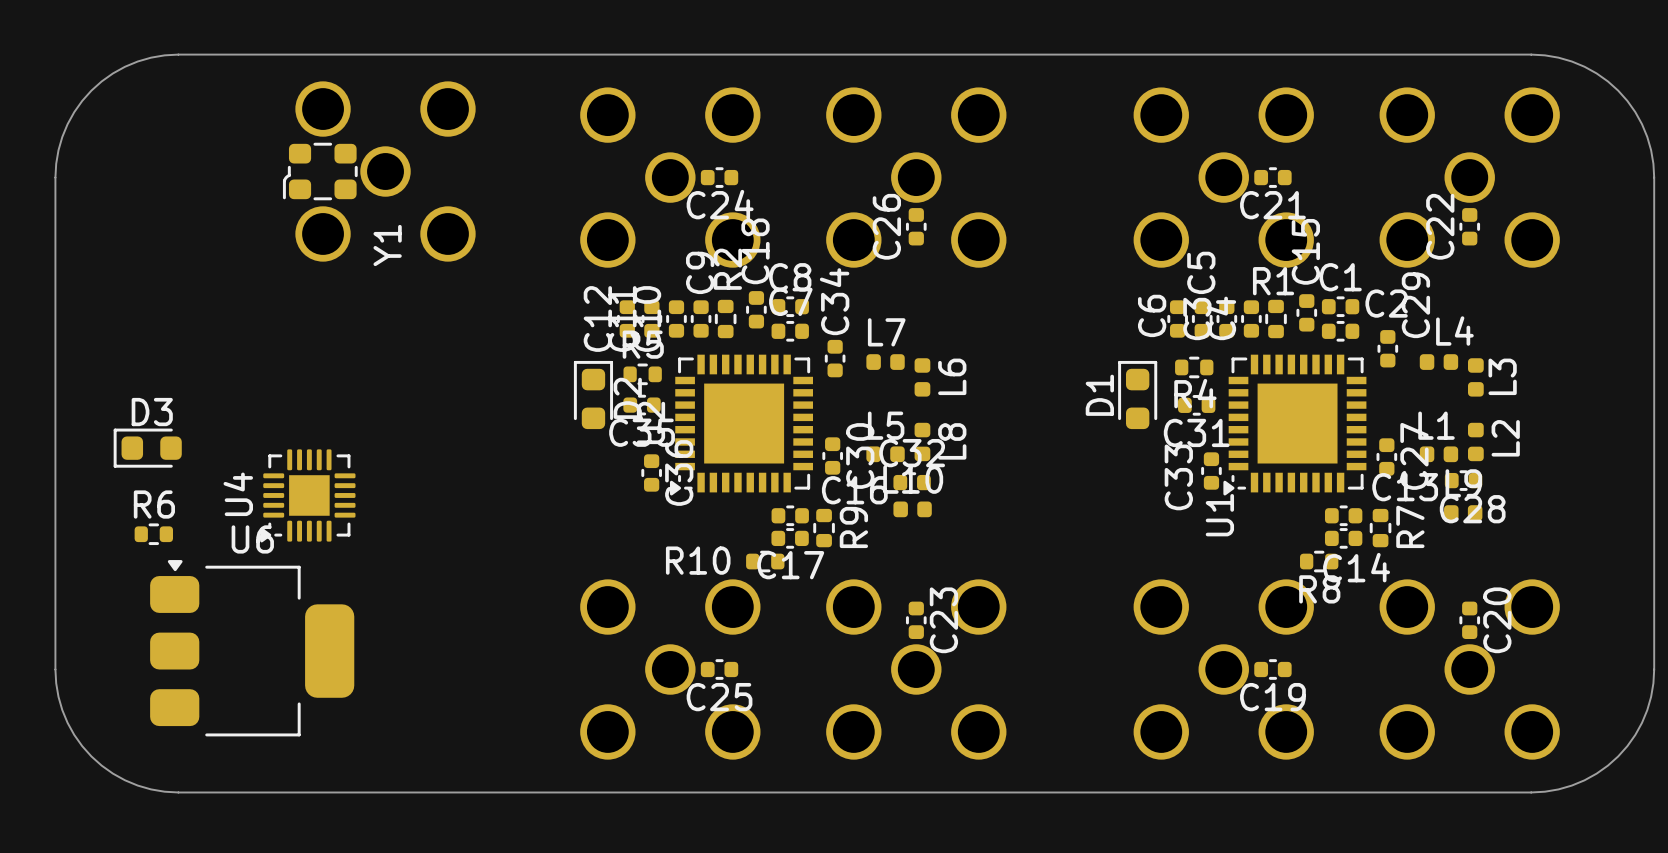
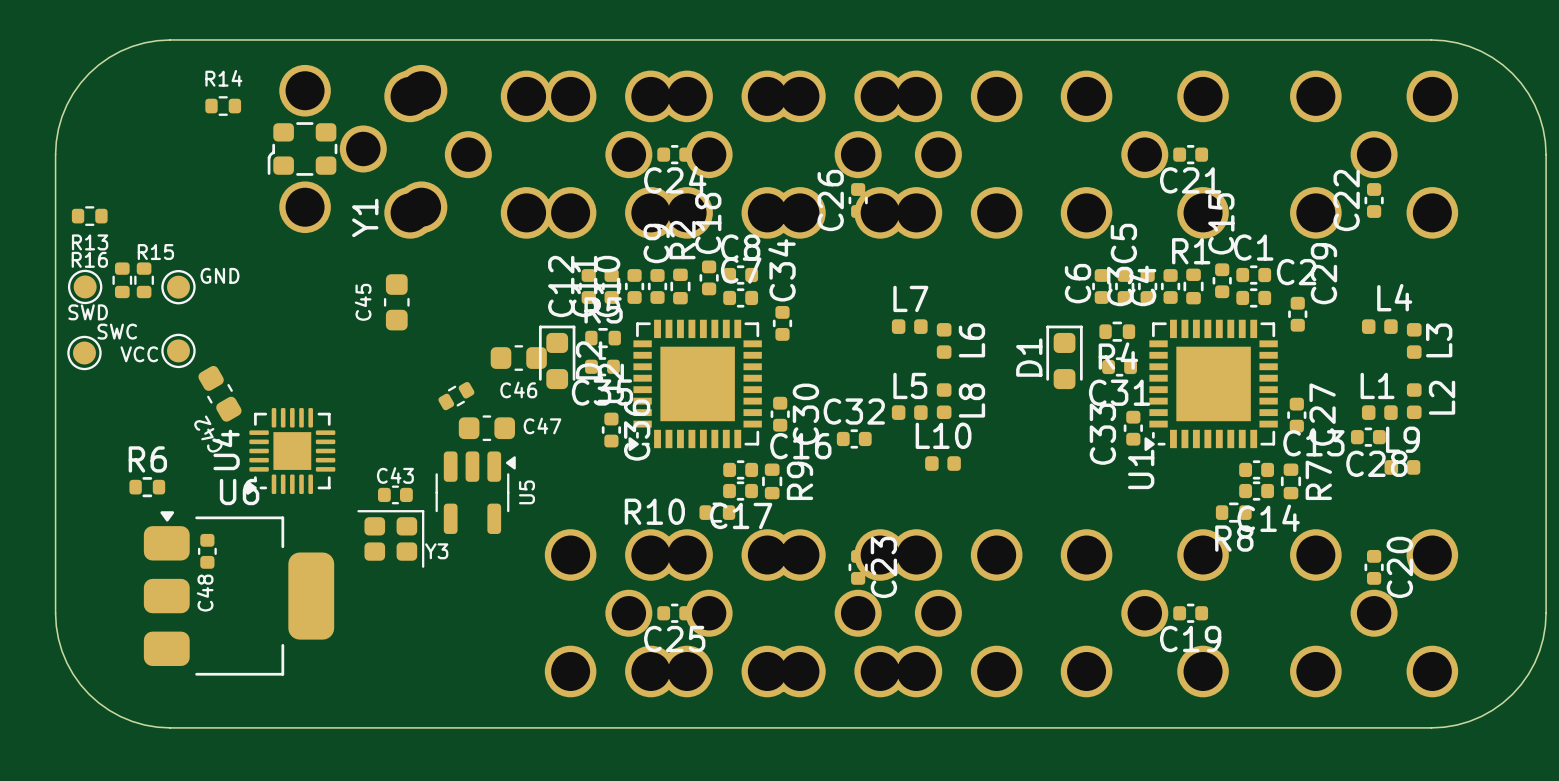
R14: none -> (223, 106)
part: none -> (468, 154)
part: none -> (709, 154)
part: none -> (938, 154)
R13: none -> (89, 216)
R16: none -> (122, 280)
R15: none -> (144, 280)
part: none -> SWD (85, 286)
part: none -> GND (178, 287)
C45: none -> (396, 302)
L7 position: (885, 362) -> (909, 326)
L4 position: (1438, 362) -> (1379, 326)
L6 position: (922, 377) -> (944, 340)
L3 position: (1475, 377) -> (1414, 340)
part: none -> VCC (178, 350)
part: none -> SWC (84, 352)
C46: none -> (518, 358)
C42: none -> (219, 393)
part: none -> (456, 396)
L8 position: (922, 441) -> (944, 401)
L2 position: (1475, 441) -> (1414, 401)
D3: (147, 448) -> none
L5 position: (885, 454) -> (909, 412)
L1 position: (1438, 454) -> (1379, 412)
C47: none -> (486, 428)
L10 position: (912, 509) -> (943, 463)
L9 position: (1463, 513) -> (1402, 467)
U5: none -> (475, 492)
C43: none -> (395, 494)
Y3: none -> (390, 538)
C48: none -> (207, 551)
part: none -> (709, 613)
part: none -> (938, 613)

